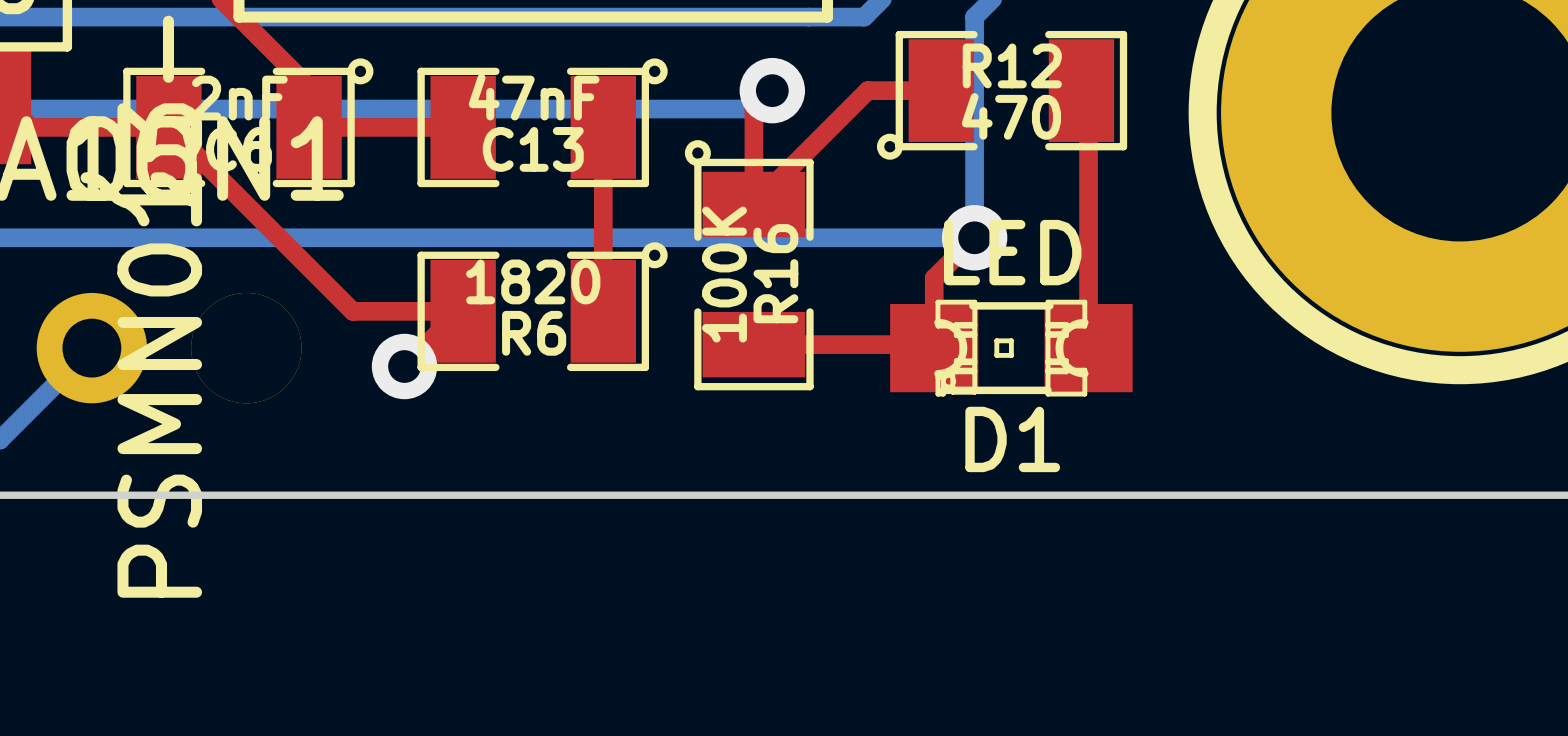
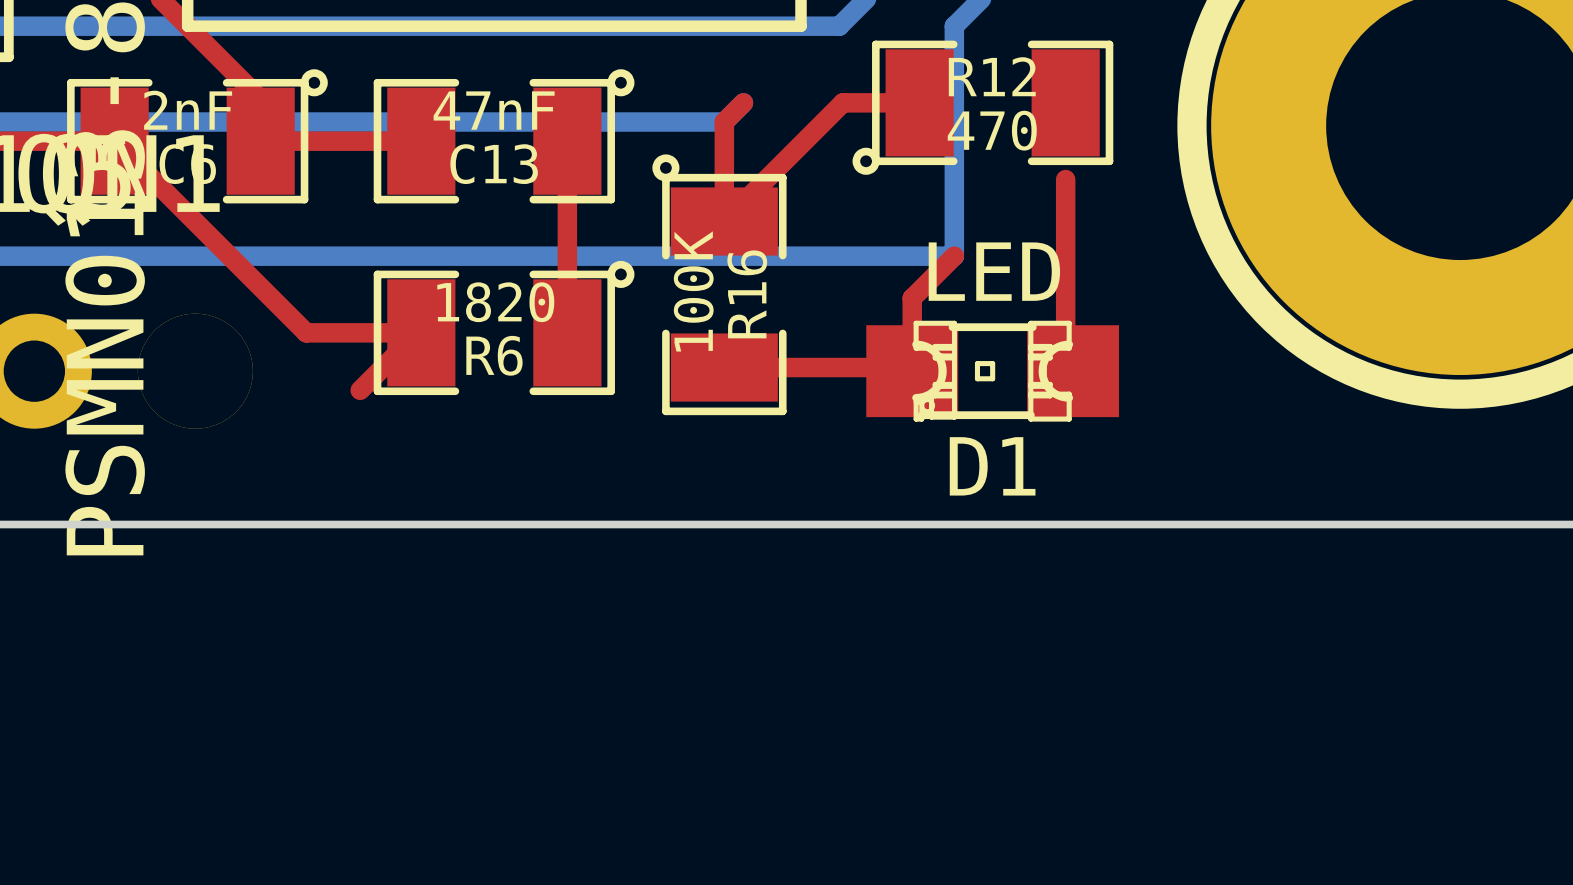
via: (772, 90) -> none
top track: (1081, 90) (1088, 97) (1088, 348) -> (1065, 179) (1065, 363) (1073, 371)
via: (974, 237) -> none
via: (404, 366) -> none

